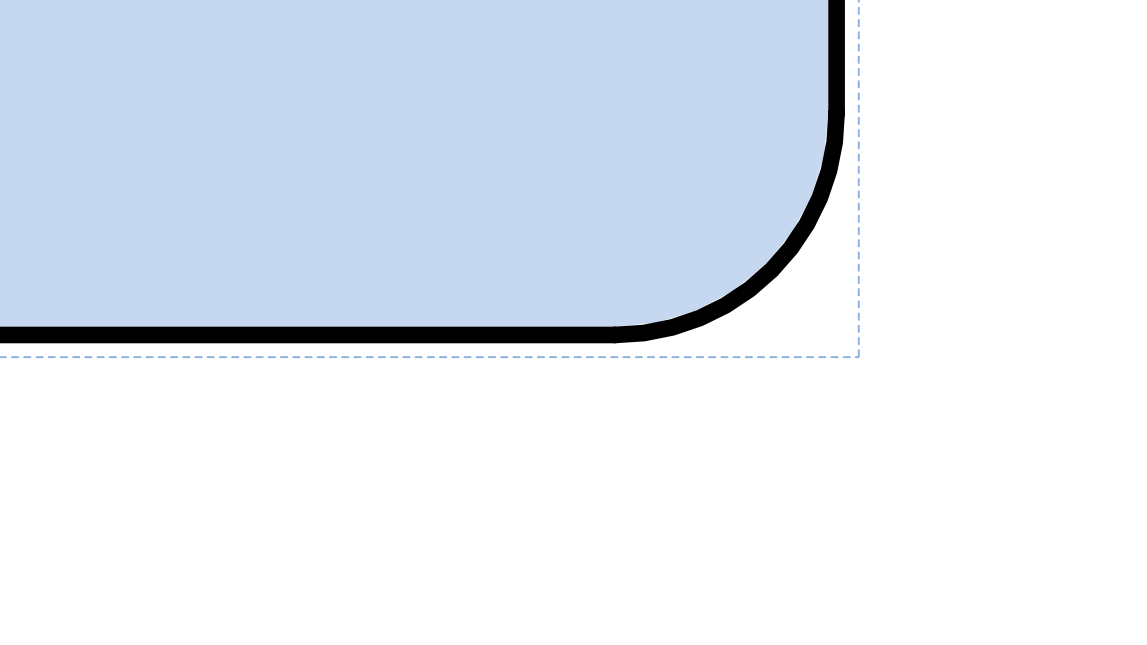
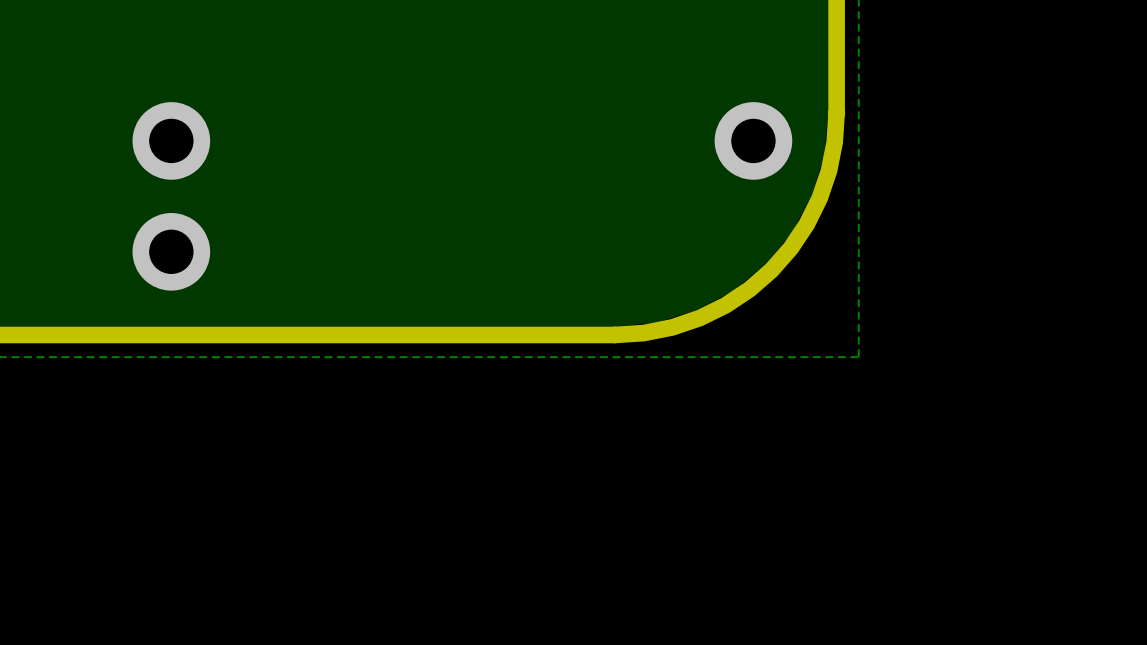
via: none -> (171, 140)
via: none -> (753, 140)
via: none -> (171, 251)

